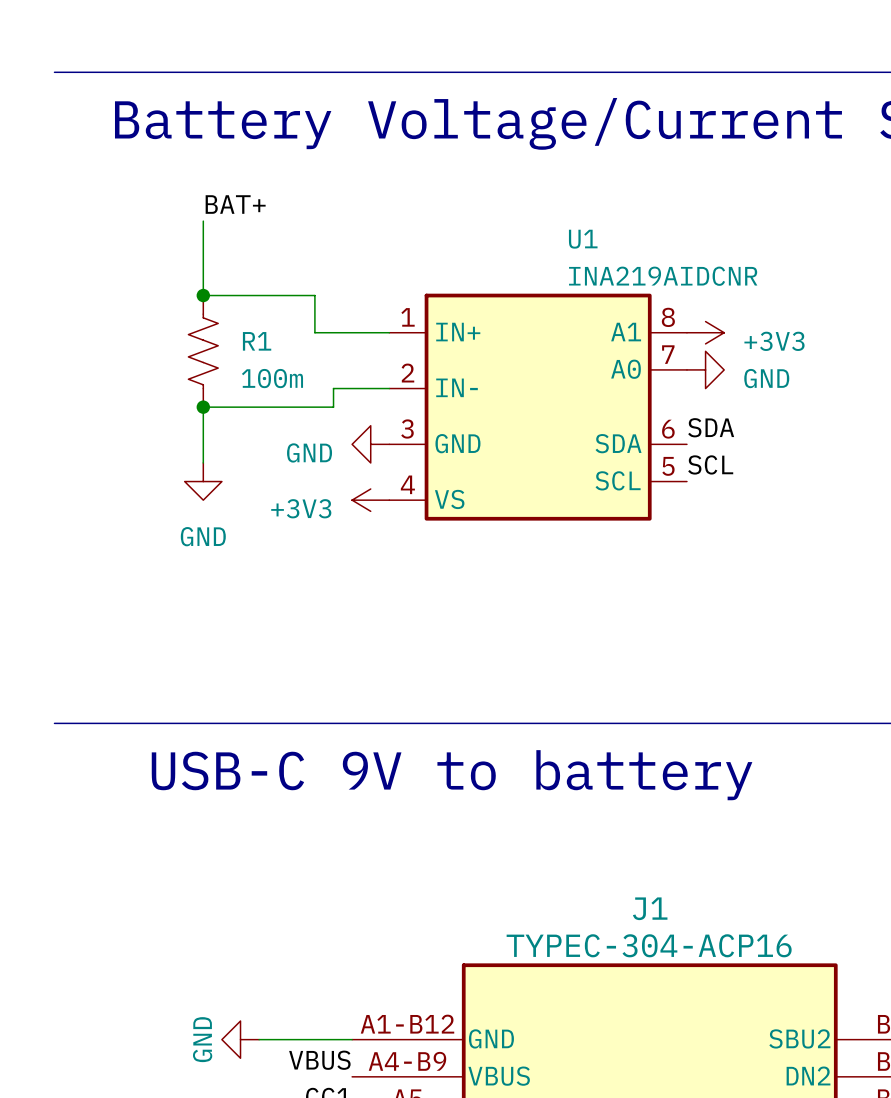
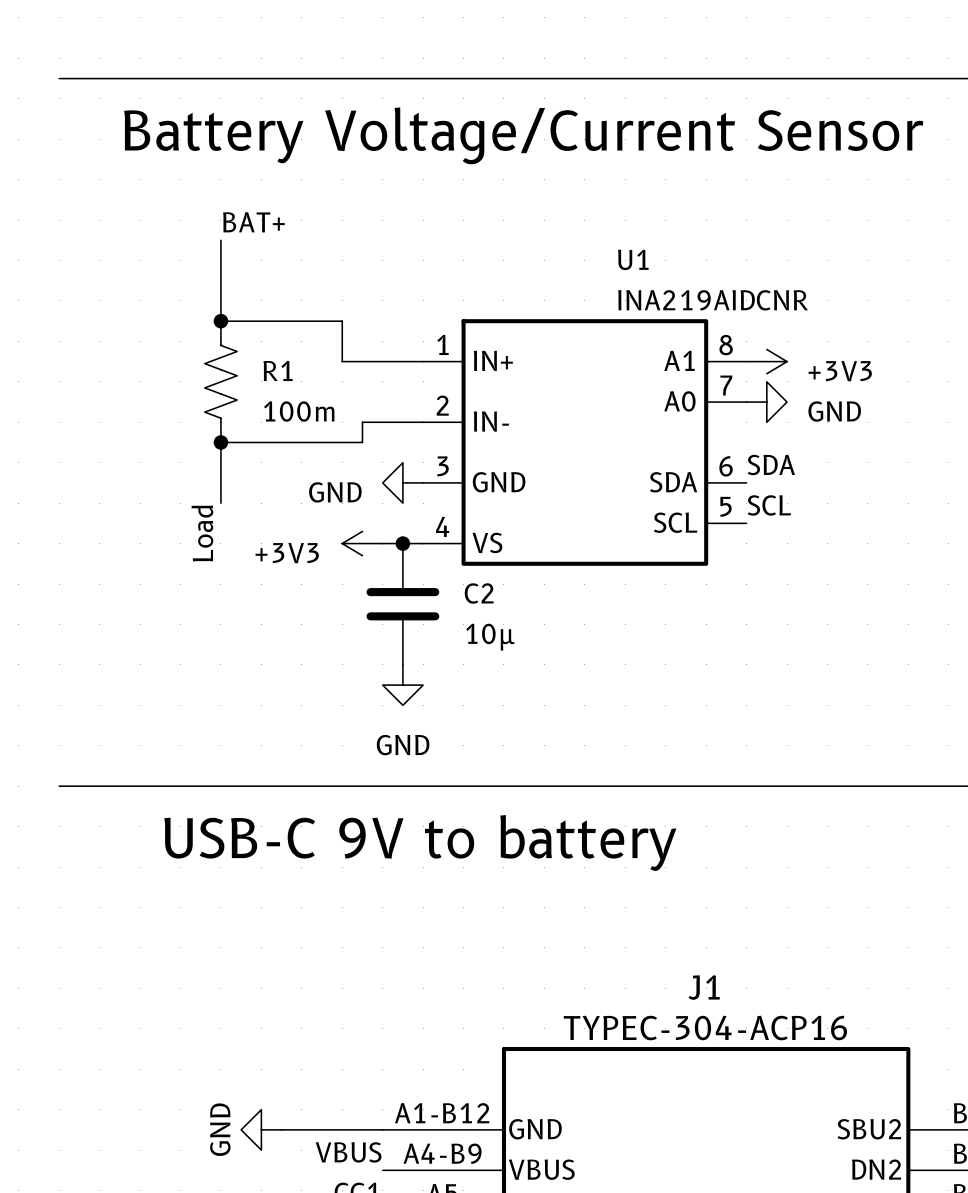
power symbol position: GND (203, 481) -> GND (402, 685)
label: none -> Load (202, 533)
power symbol position: +3V3 (370, 500) -> +3V3 (362, 543)
junction: none -> (402, 543)
C2: none -> 10µ (402, 604)

